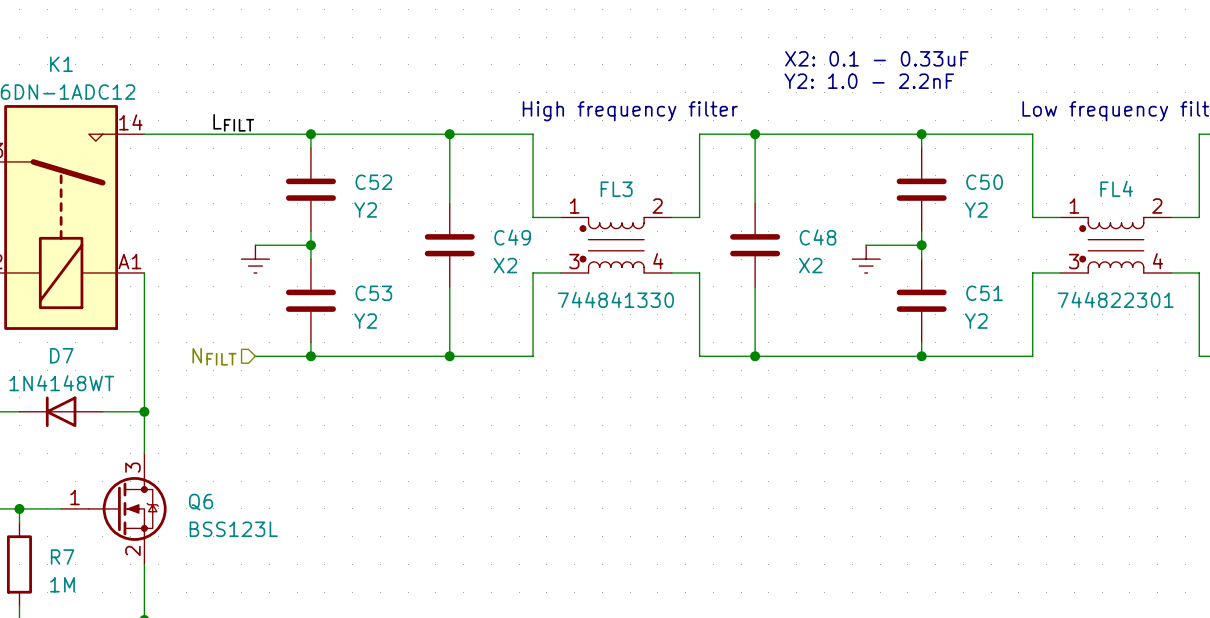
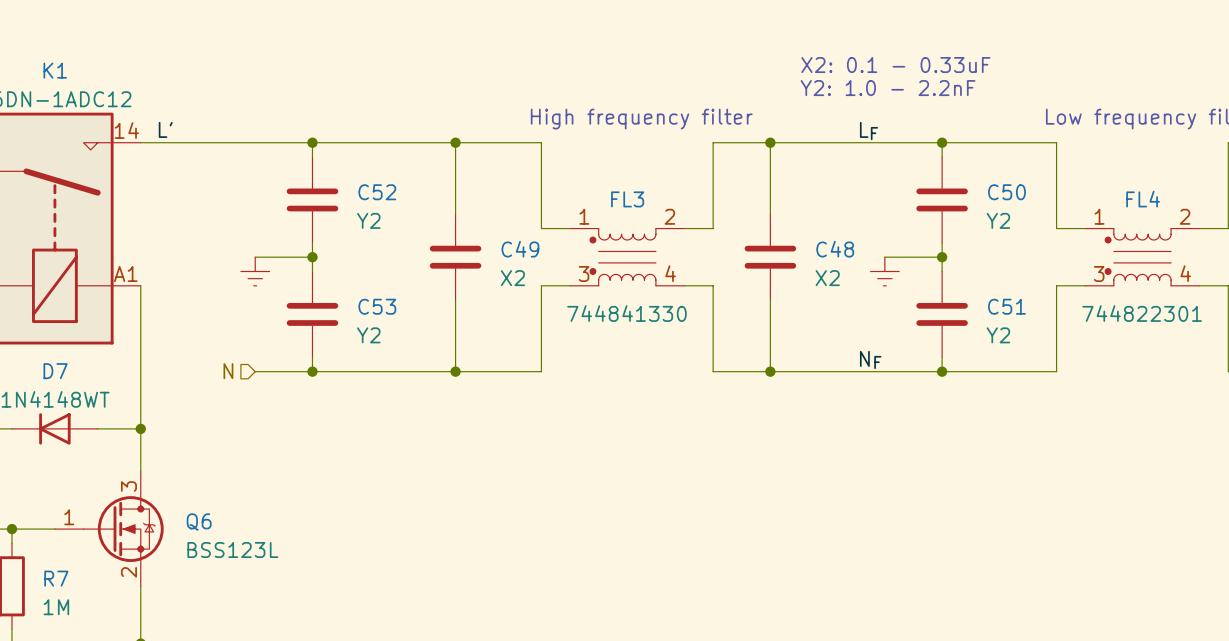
label: none -> L' (165, 129)
label: LFILT (233, 122) -> none
label: none -> LF (868, 131)
label: none -> NF (870, 359)
hierarchical label: NFILT (214, 356) -> N (228, 371)

